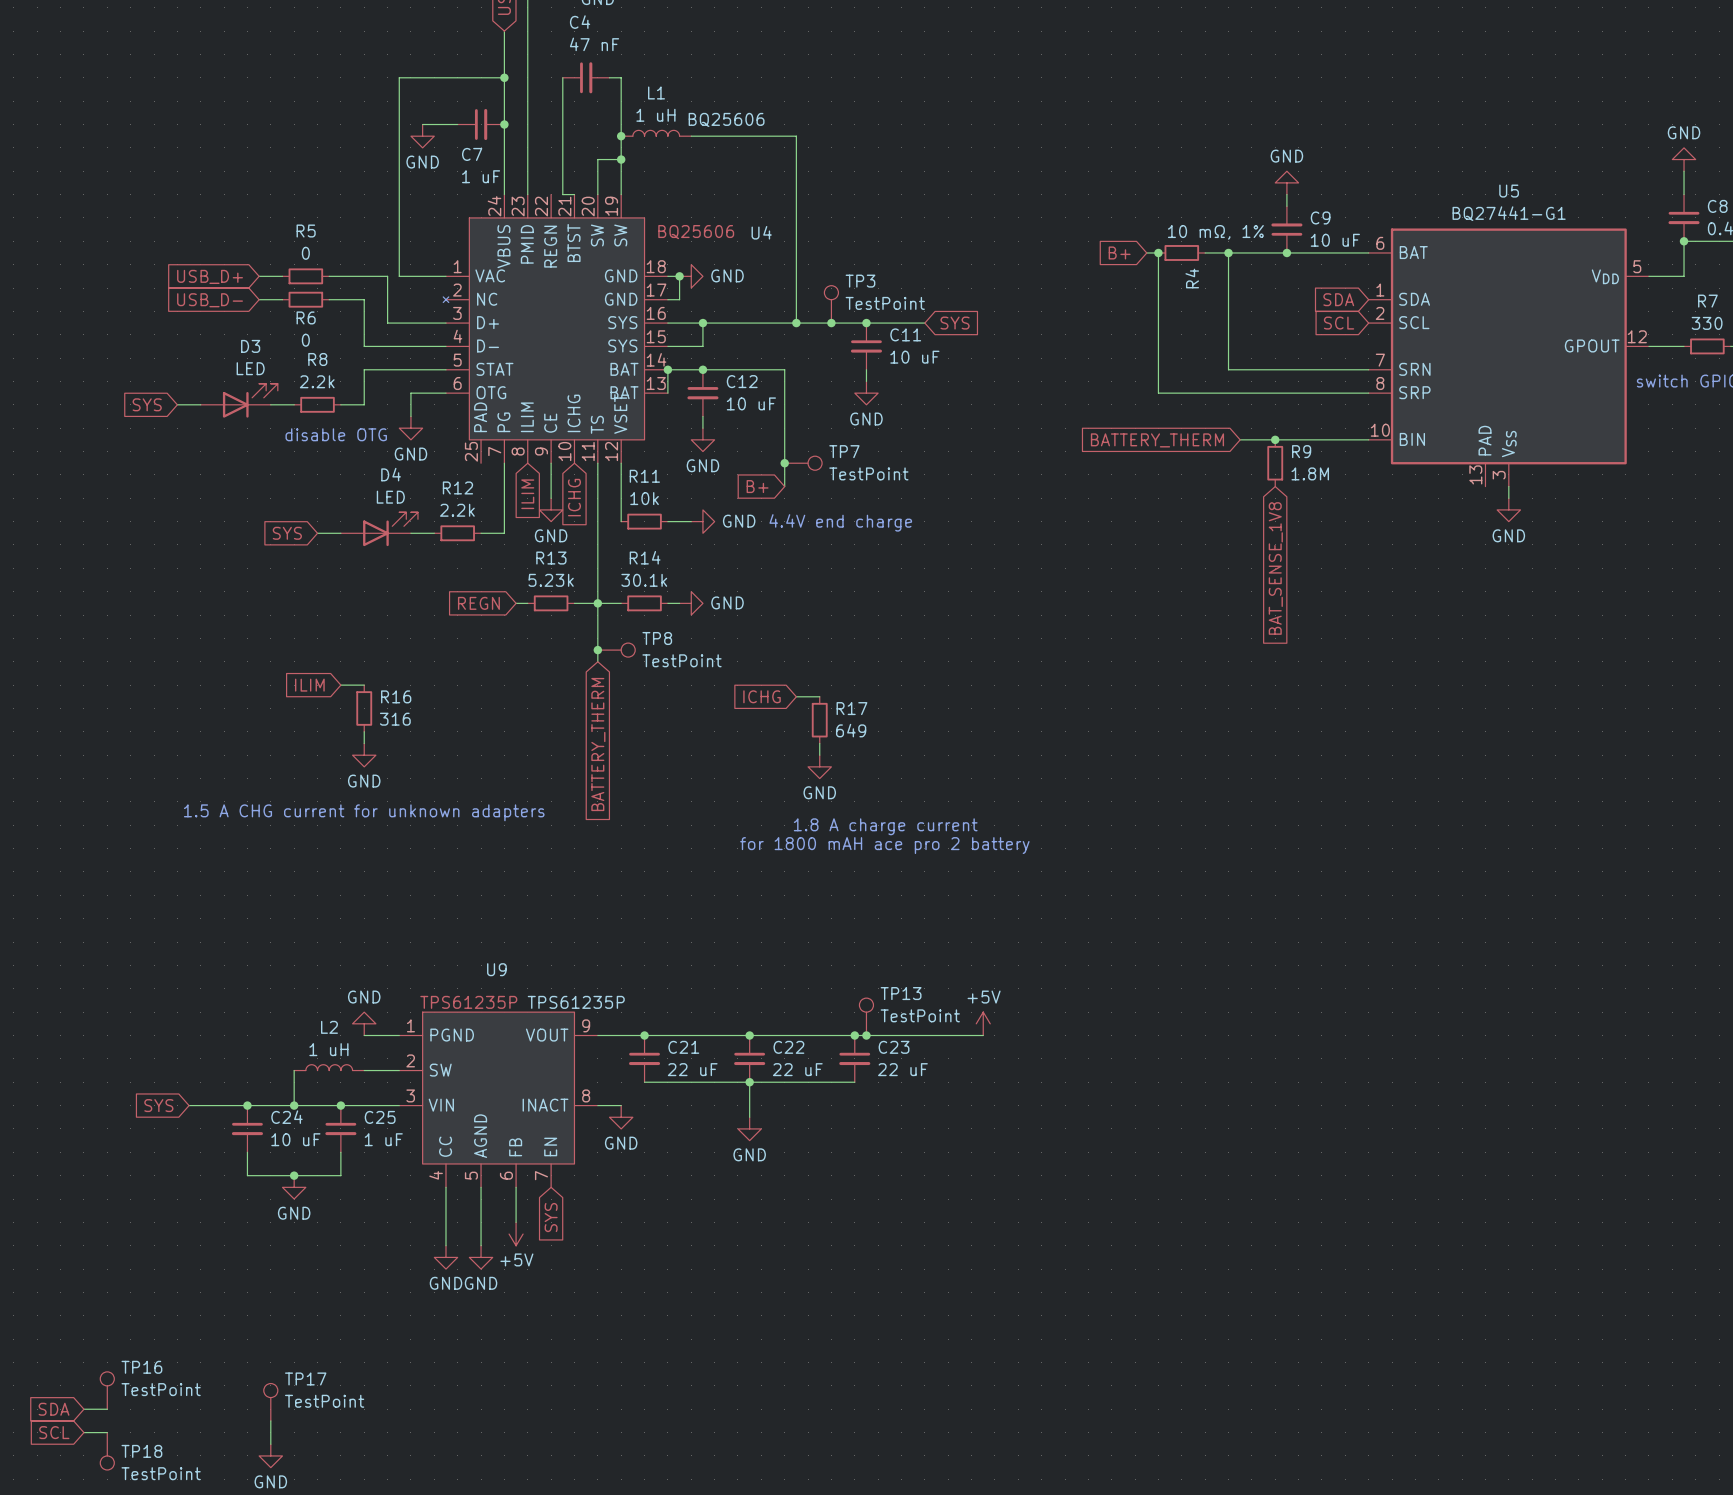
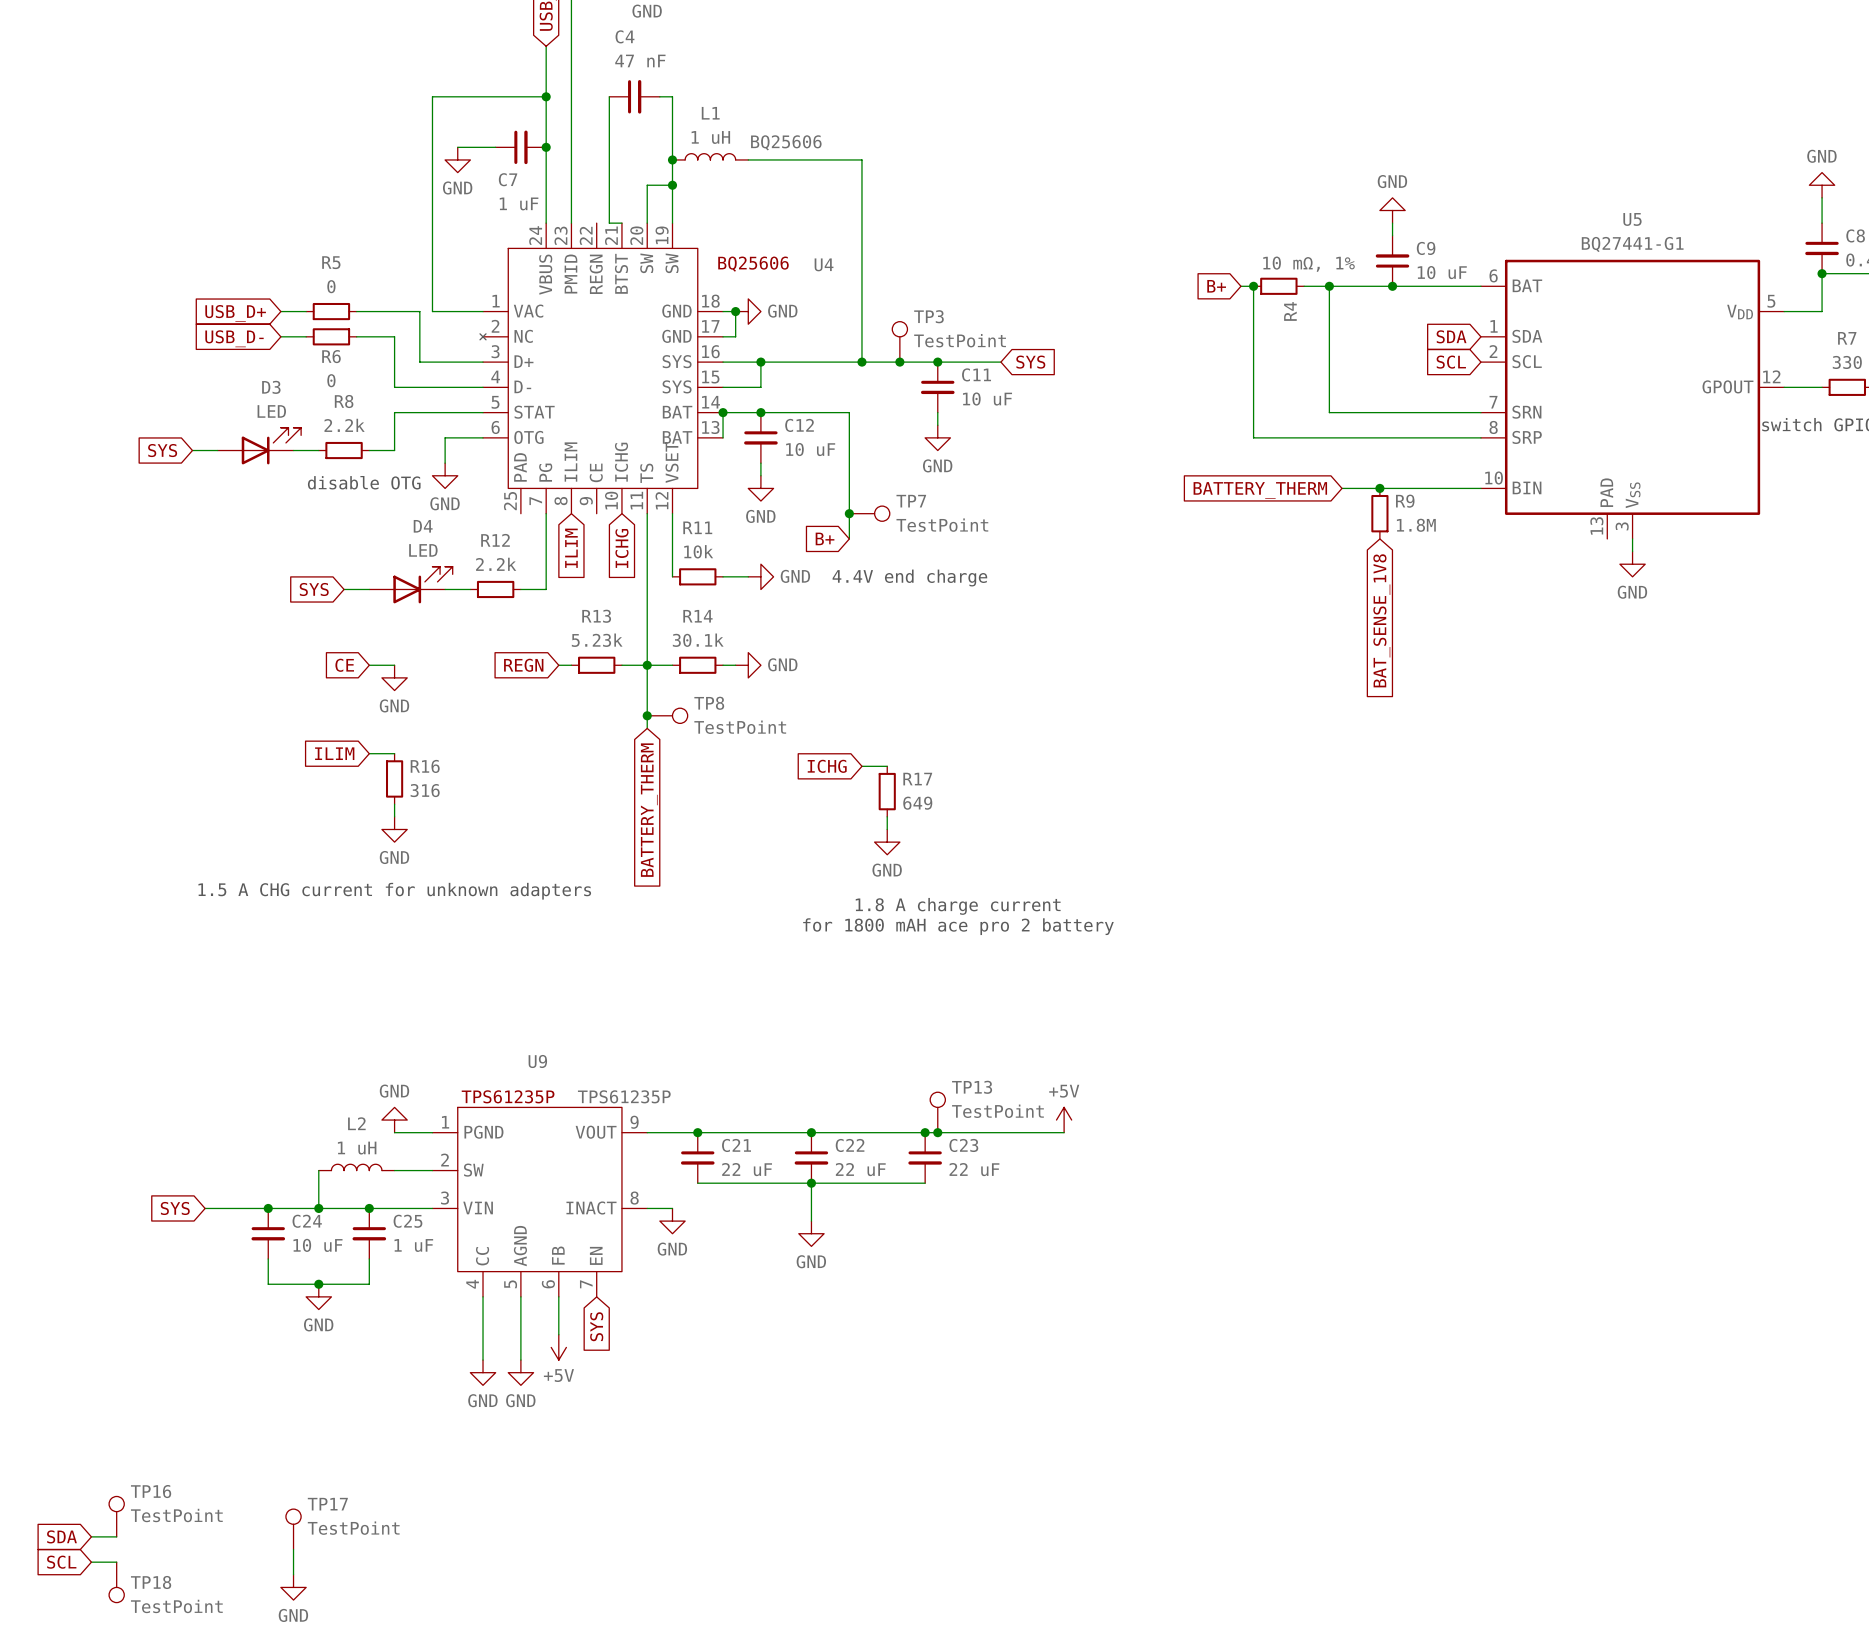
wire: (551, 463) (551, 498) -> none
power symbol position: GND (551, 509) -> GND (394, 677)
global label: none -> CE (344, 665)
wire: none -> (369, 665) (394, 665)

